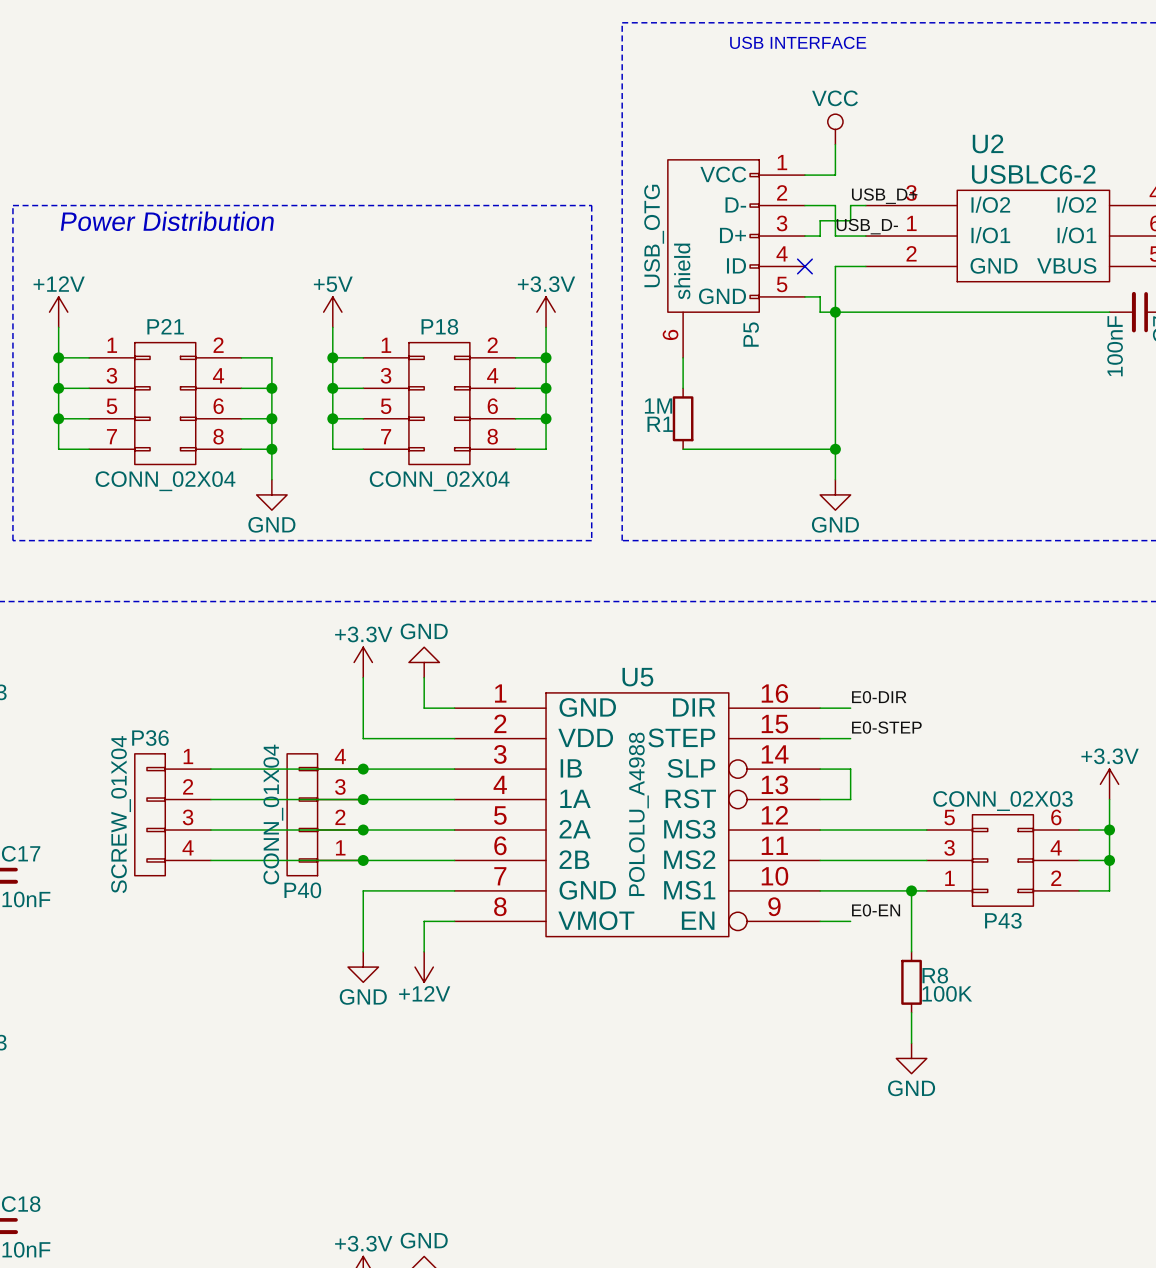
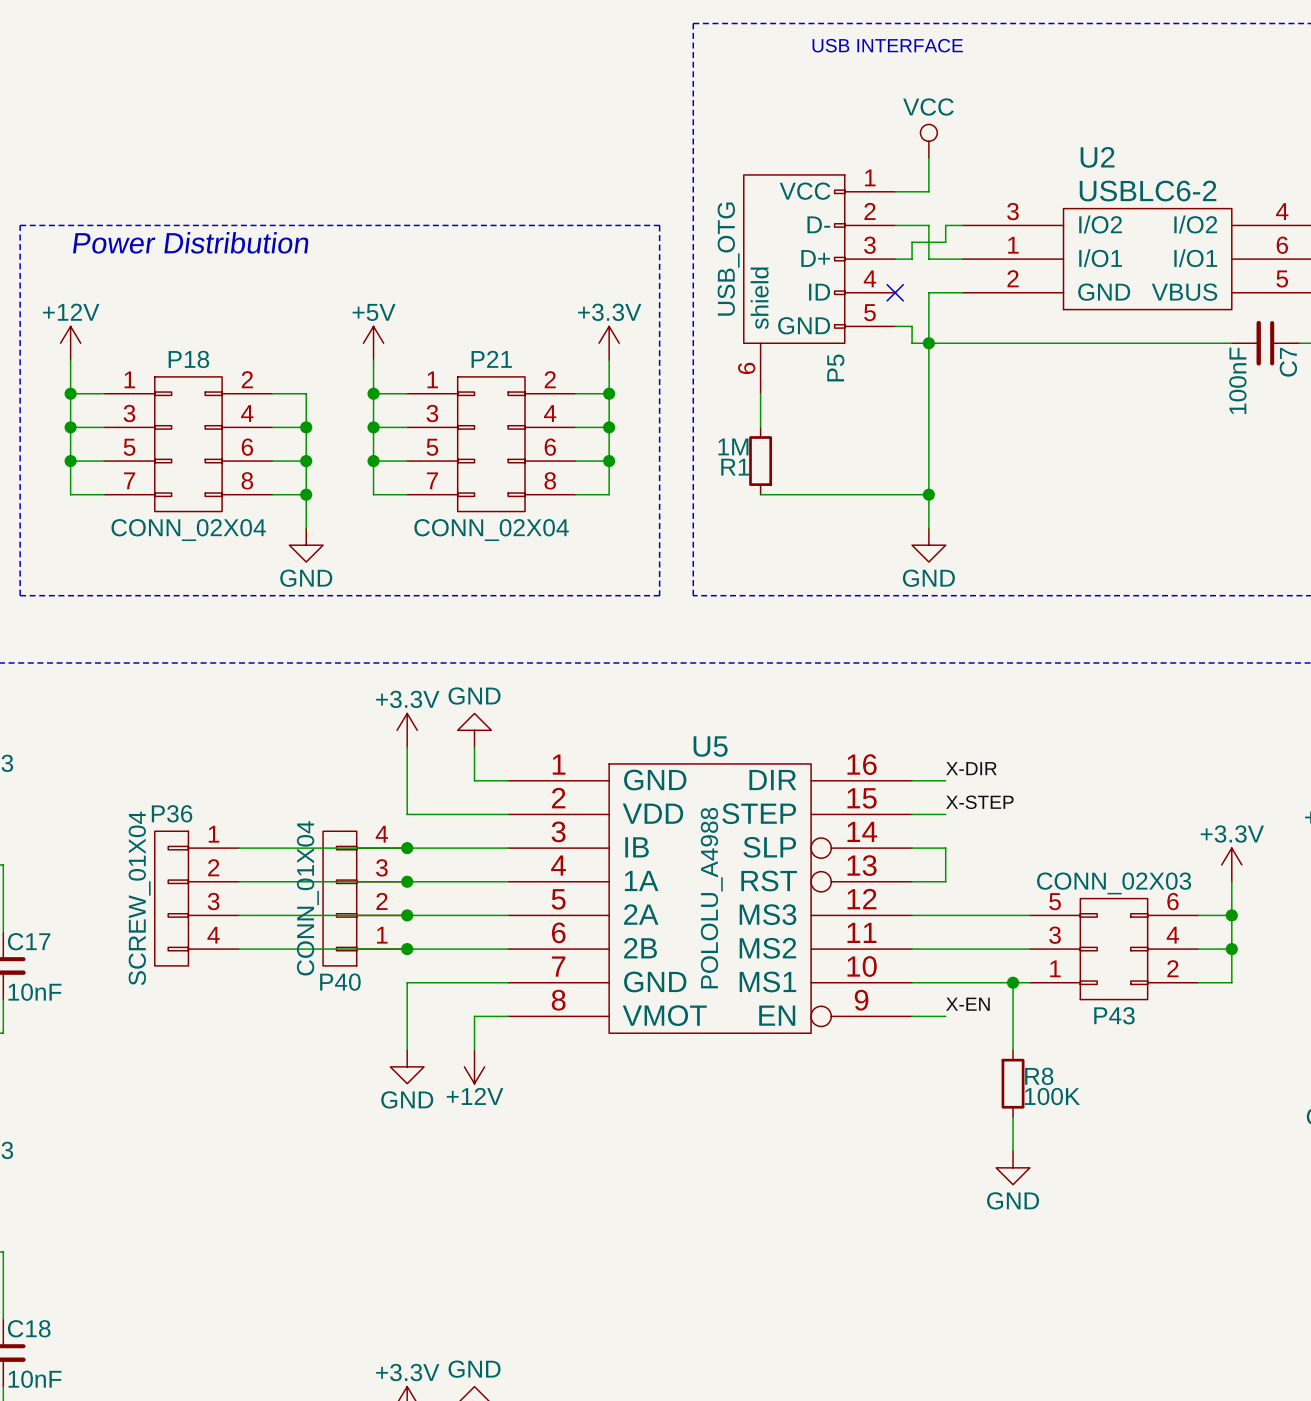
label: USB_D+ (884, 196) -> none
label: USB_D- (867, 226) -> none
P21 name: P21 (165, 326) -> P18 (188, 359)
P18 name: P18 (439, 326) -> P21 (491, 359)
label: E0-DIR (879, 697) -> X-DIR (971, 768)
label: E0-STEP (886, 727) -> X-STEP (979, 802)
label: E0-EN (876, 910) -> X-EN (967, 1004)

